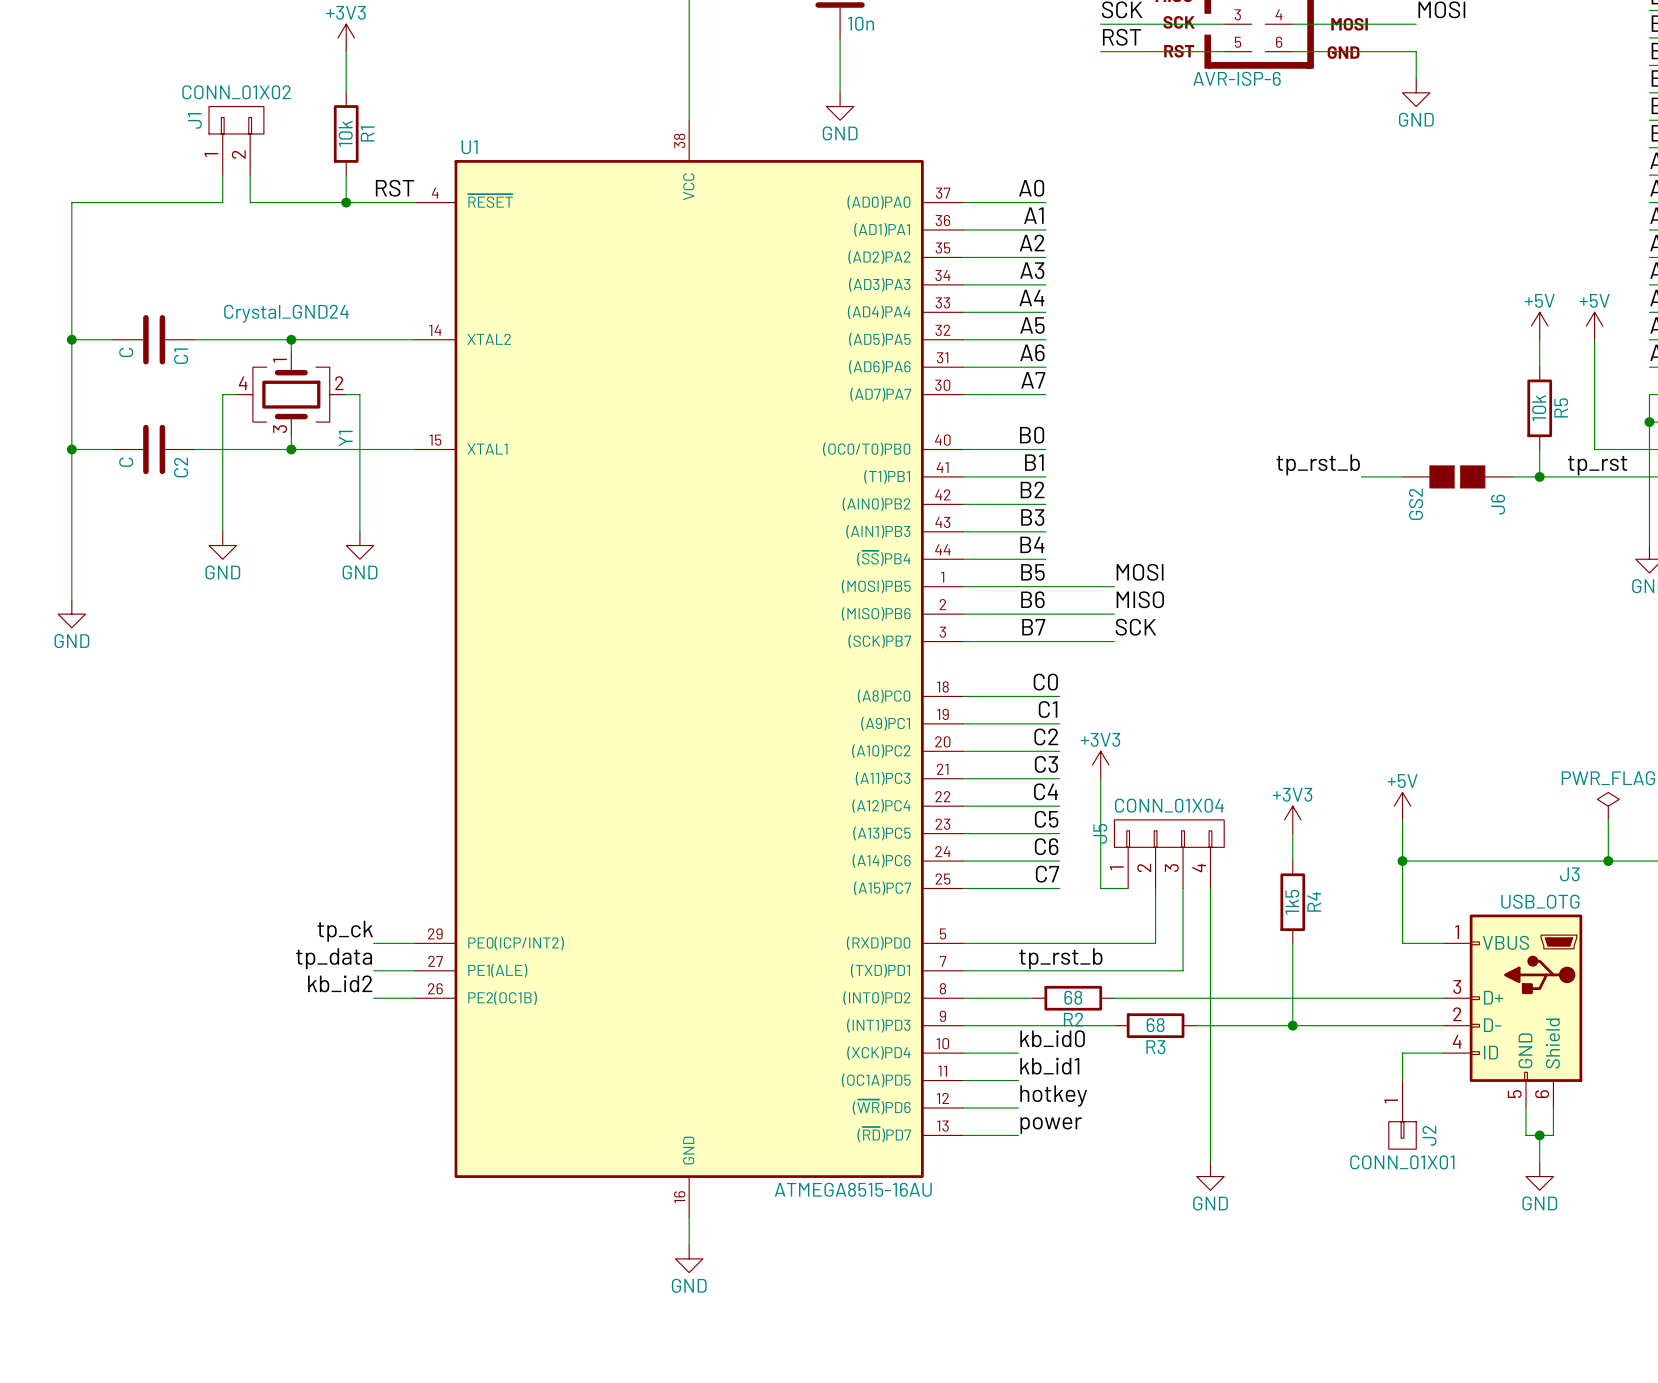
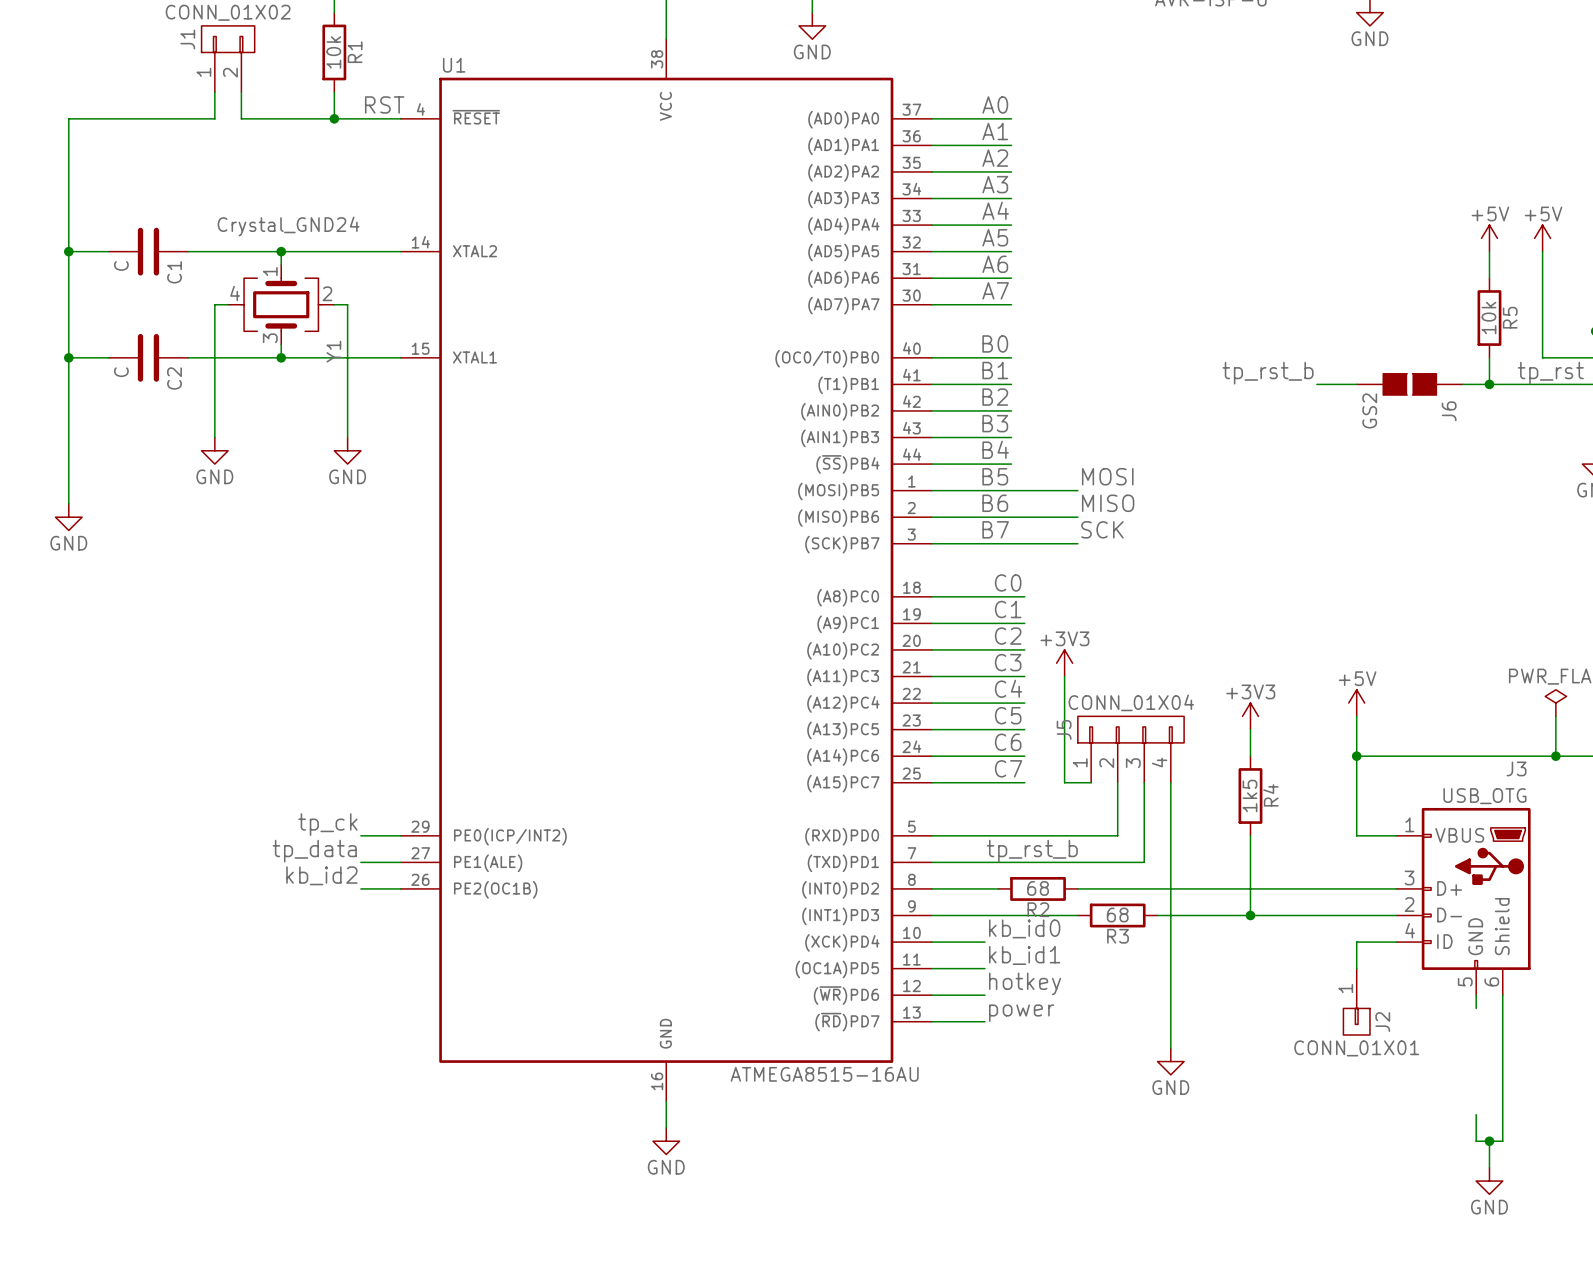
wire: (1525, 1121) (1525, 1135) (1553, 1135) -> (1476, 1114) (1476, 1141) (1502, 1141) (1502, 1021)
wire: (1539, 1135) (1539, 1162) -> (1489, 1141) (1489, 1167)
junction: (1539, 1135) -> none
power symbol position: GND (1539, 1176) -> GND (1489, 1181)
junction: none -> (1489, 1141)

